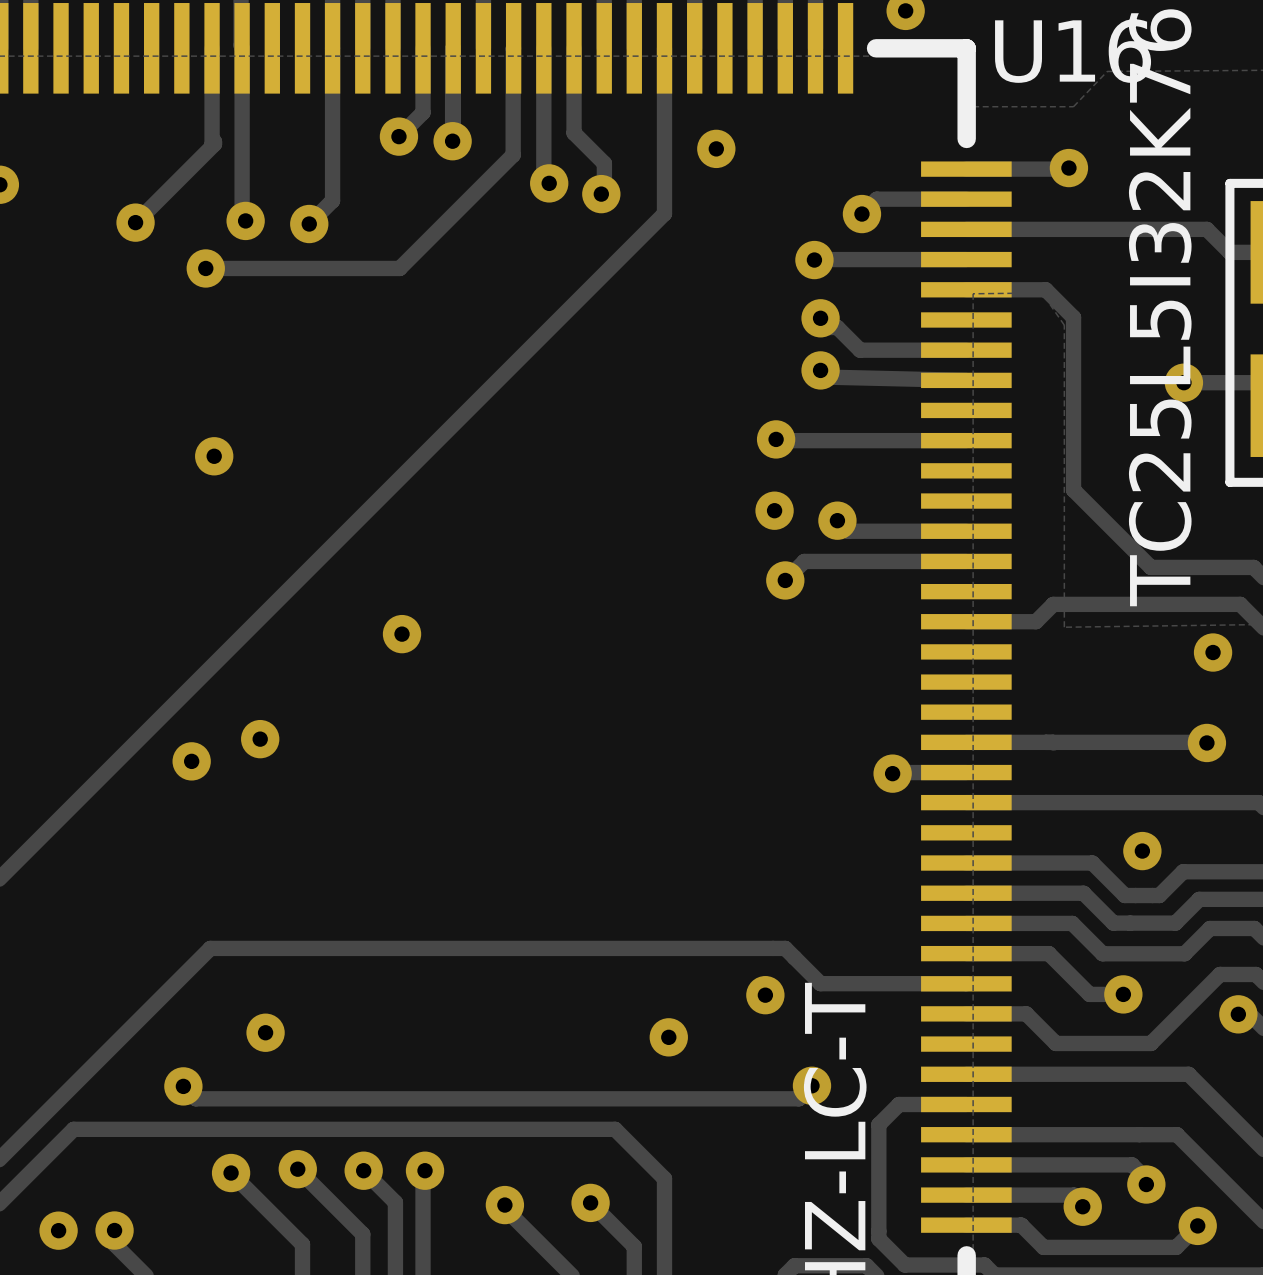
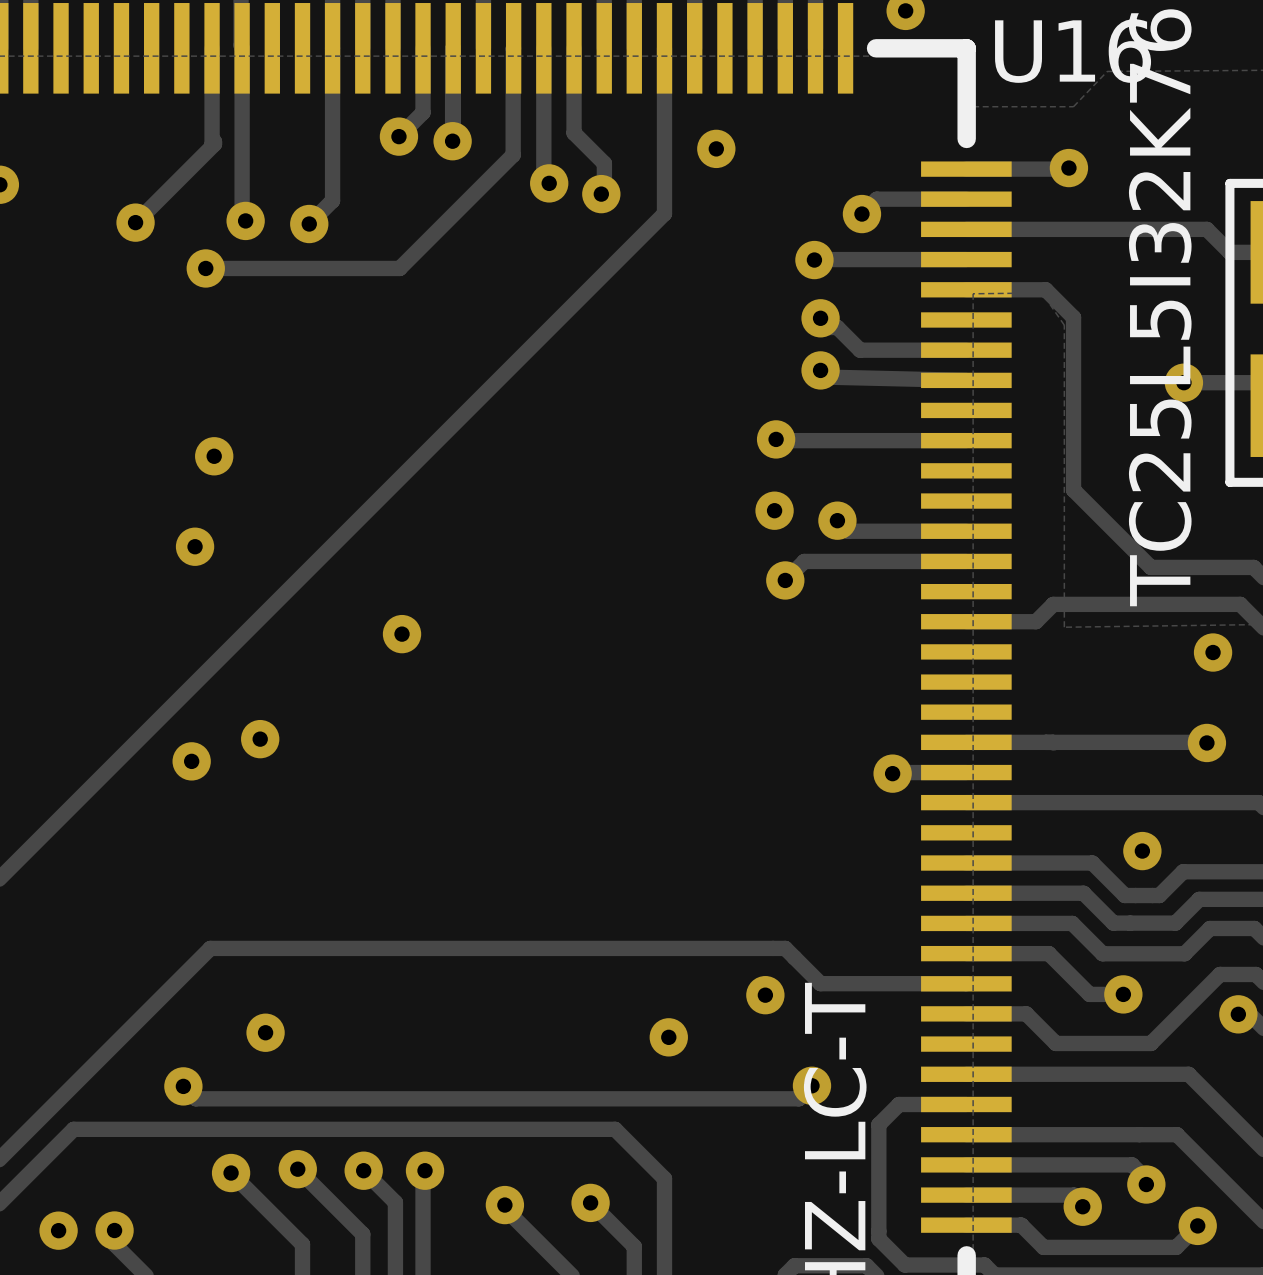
via: none -> (195, 546)

